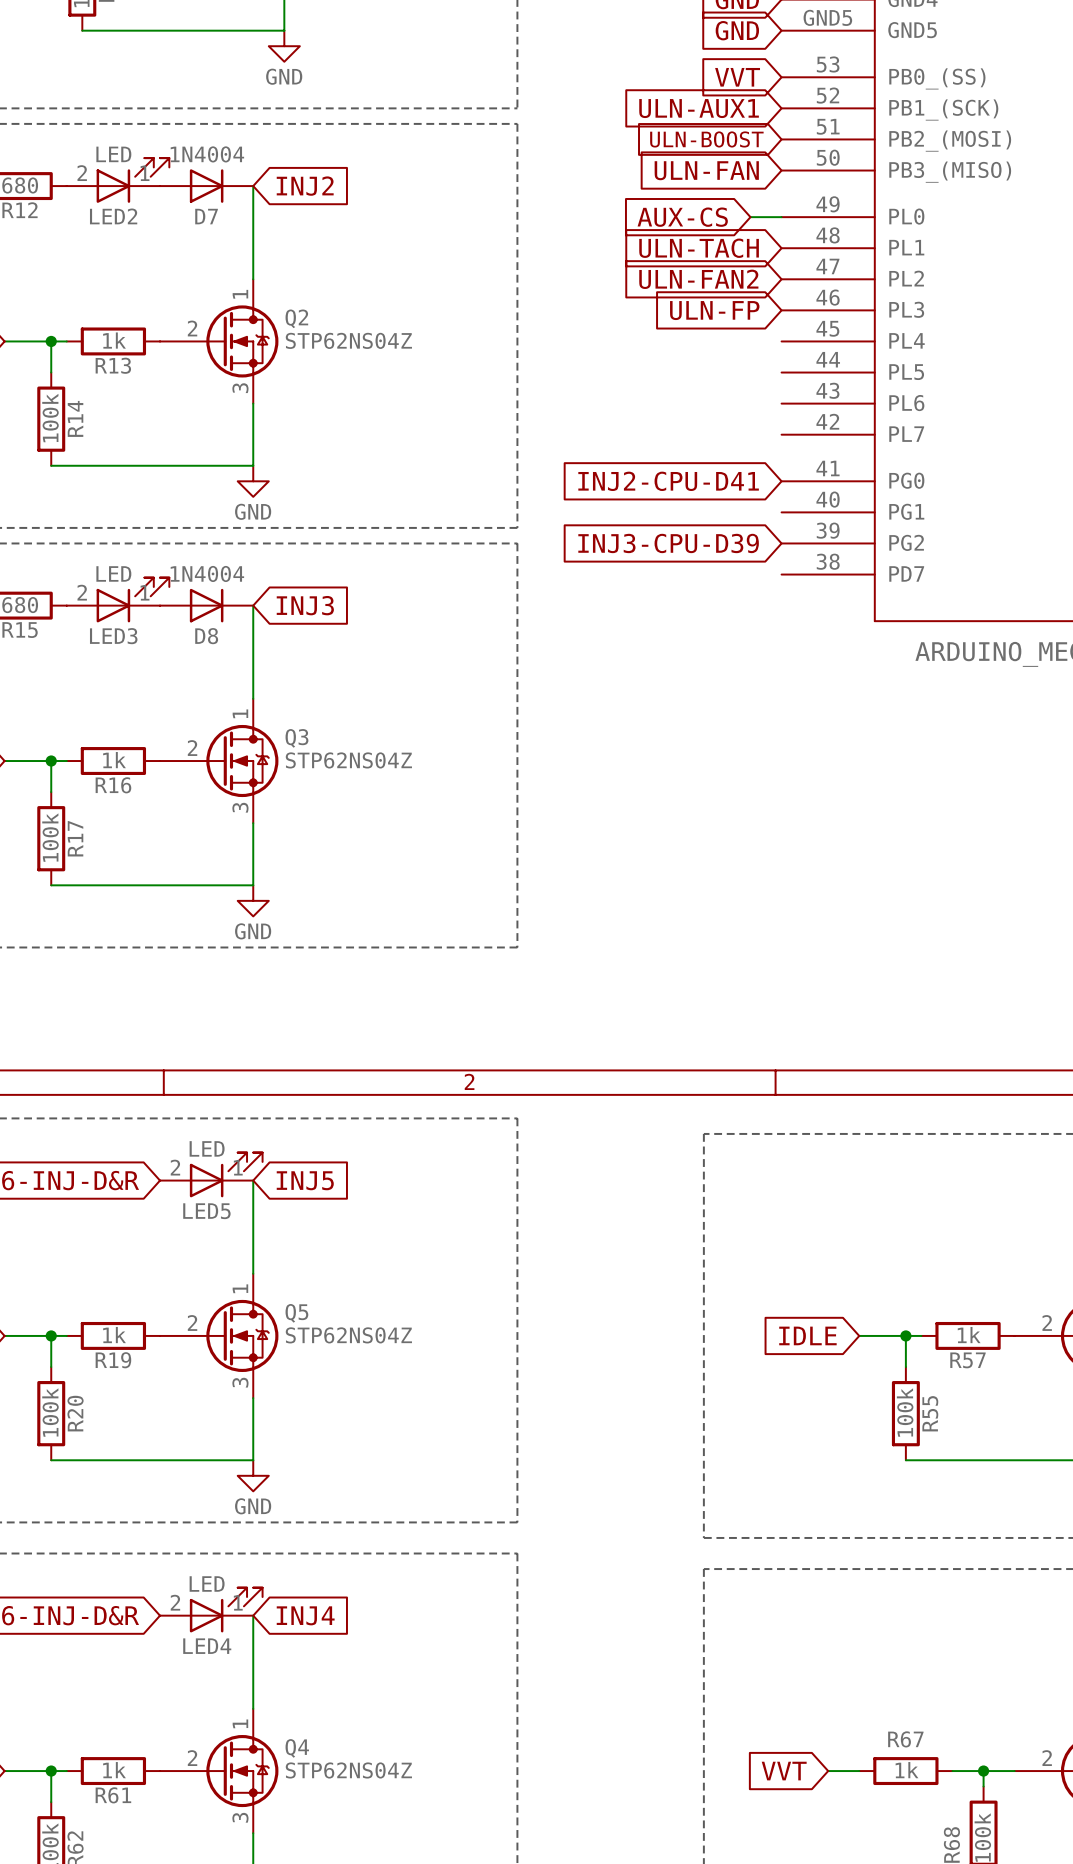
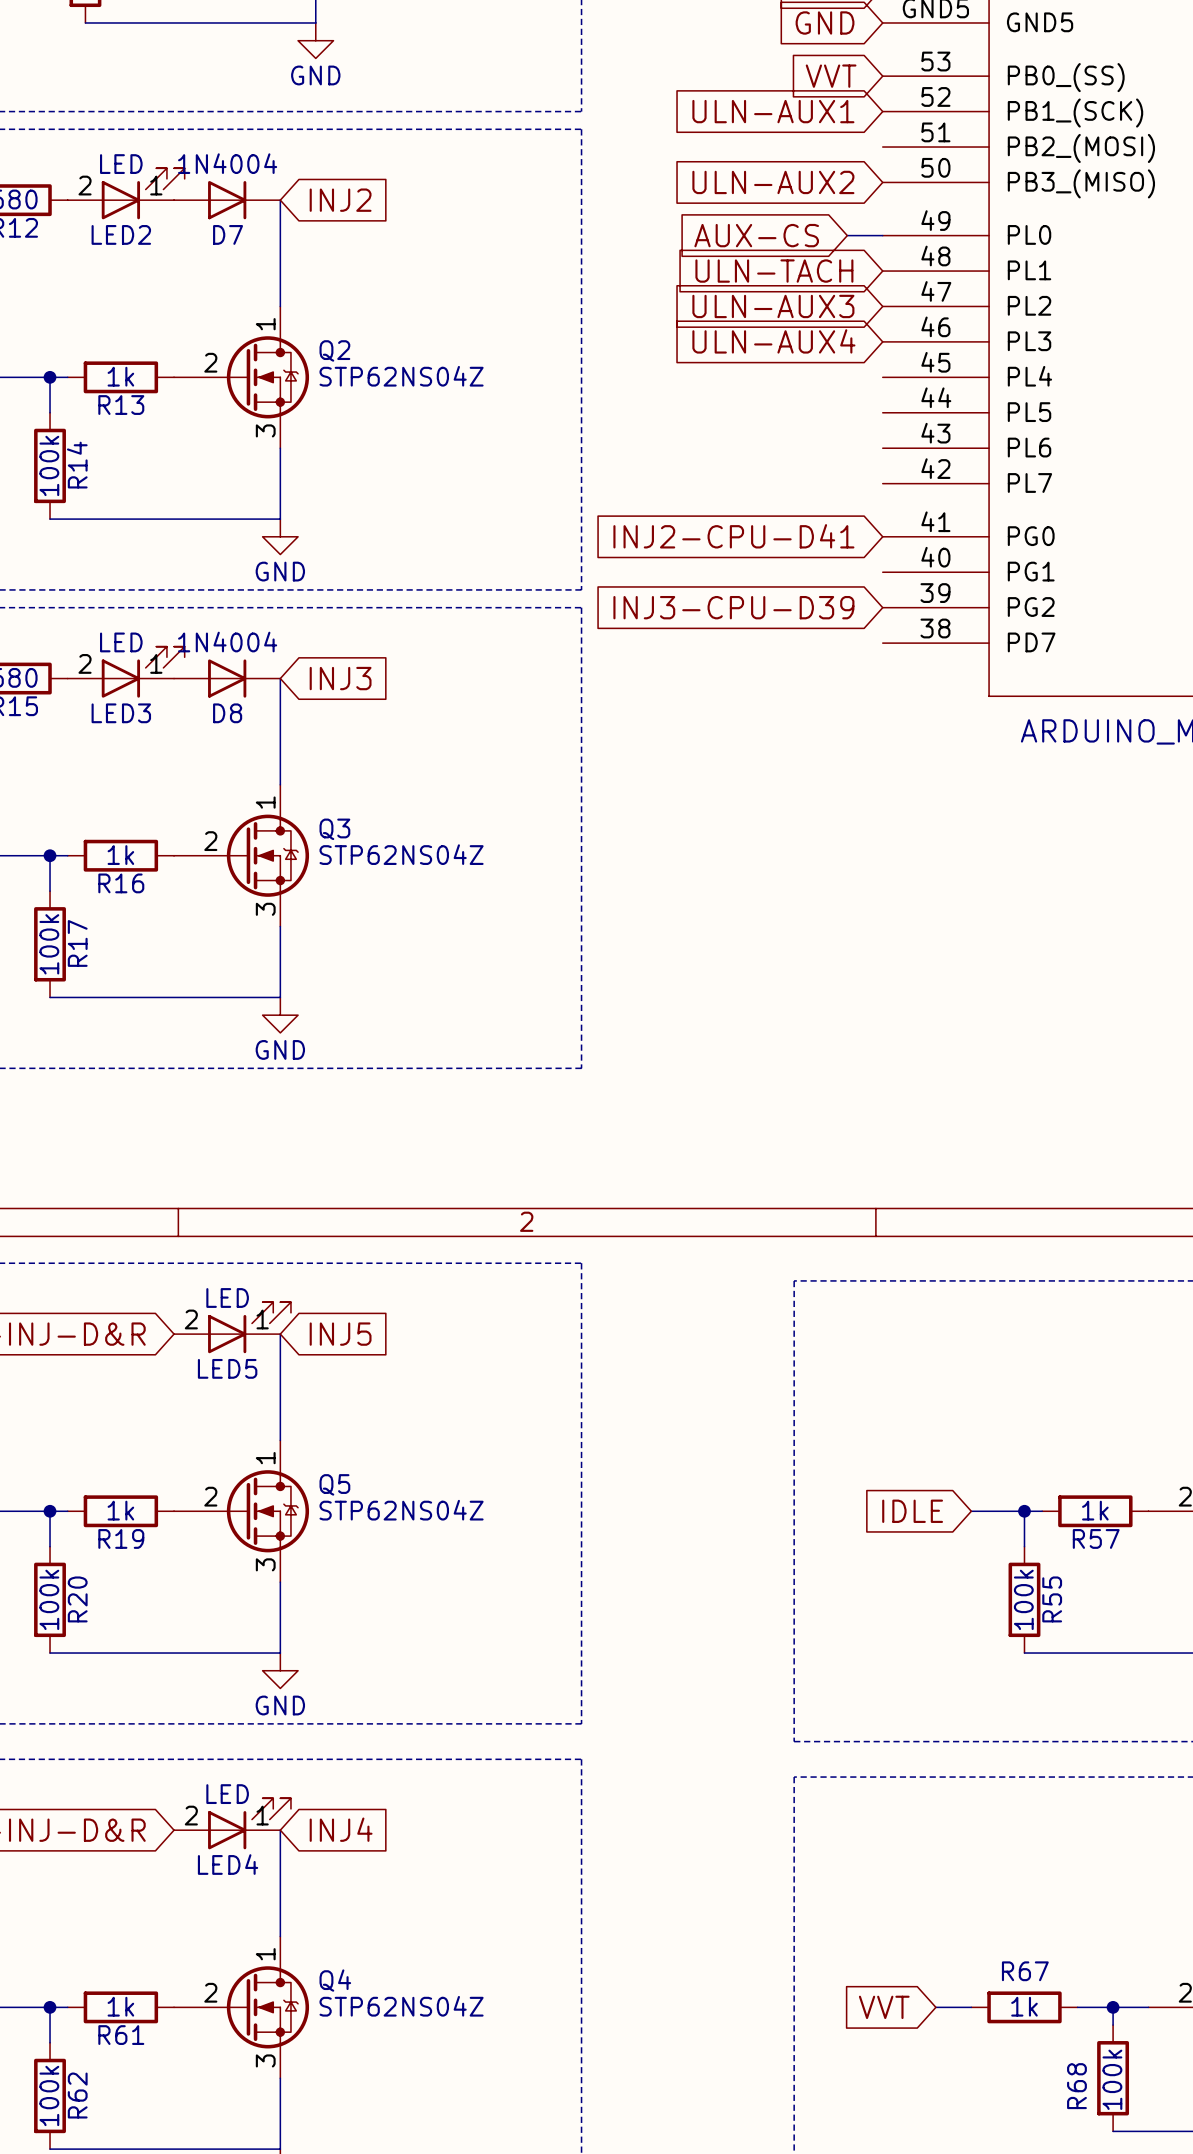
global label: ULN-BOOST (706, 139) -> none
global label: ULN-FAN (706, 170) -> ULN-AUX2 (773, 182)
global label: ULN-FAN2 (698, 279) -> ULN-AUX3 (773, 306)
global label: ULN-FP (714, 310) -> ULN-AUX4 (773, 341)

